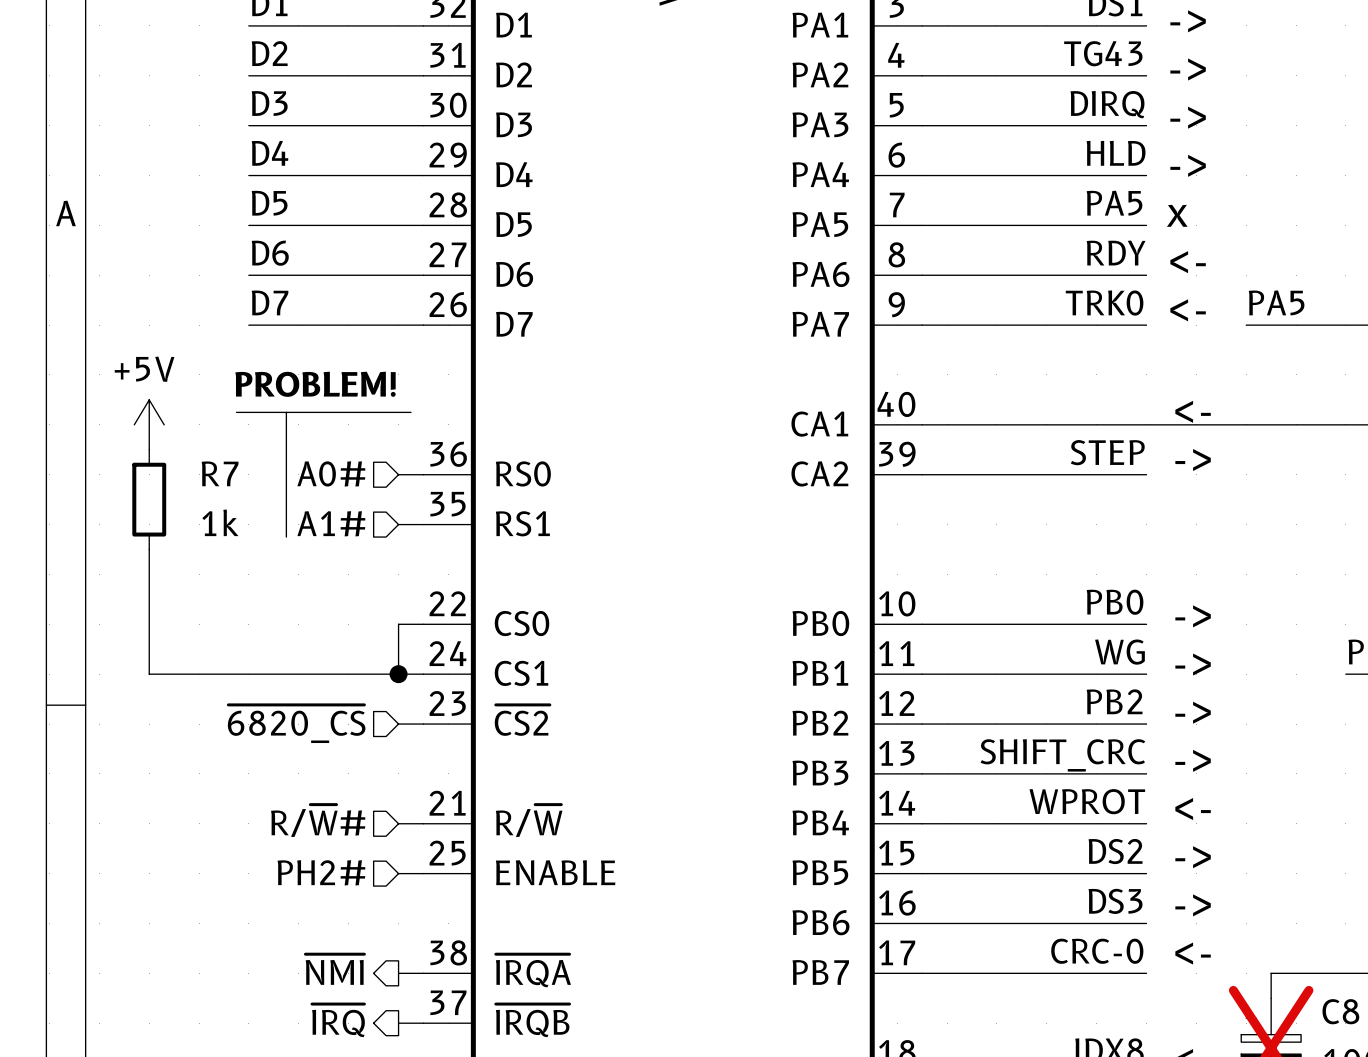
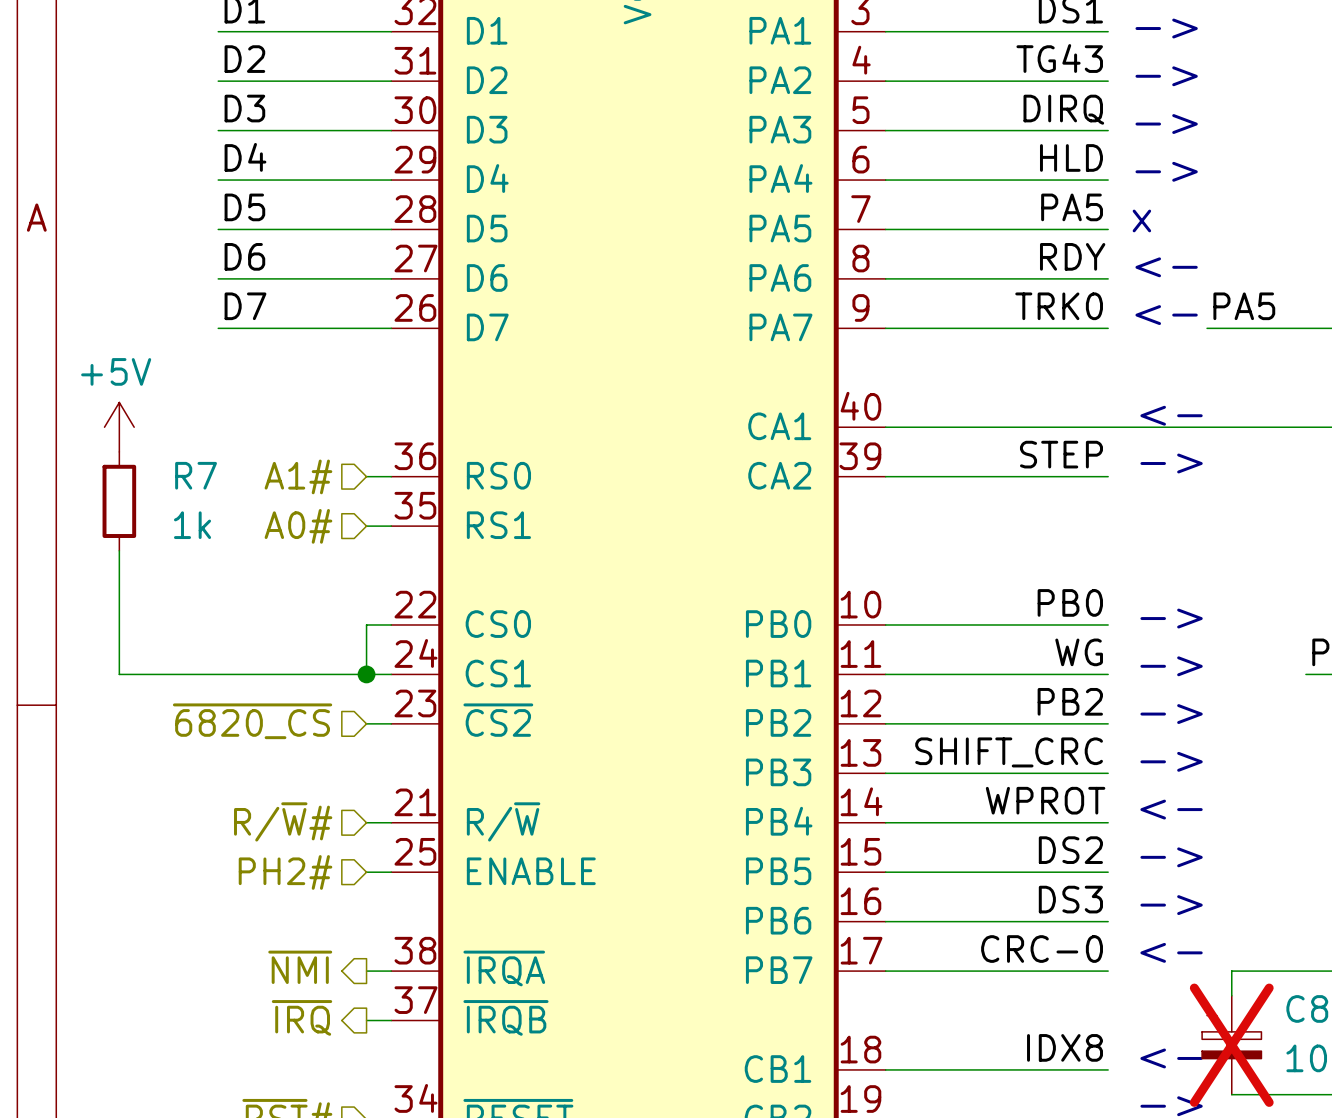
text: PROBLEM! (315, 384) -> none
line: (236, 412) (411, 412) -> none
line: (286, 412) (286, 537) -> none
hierarchical label: A0# (331, 473) -> A1# (298, 476)
hierarchical label: A1# (331, 523) -> A0# (298, 526)

